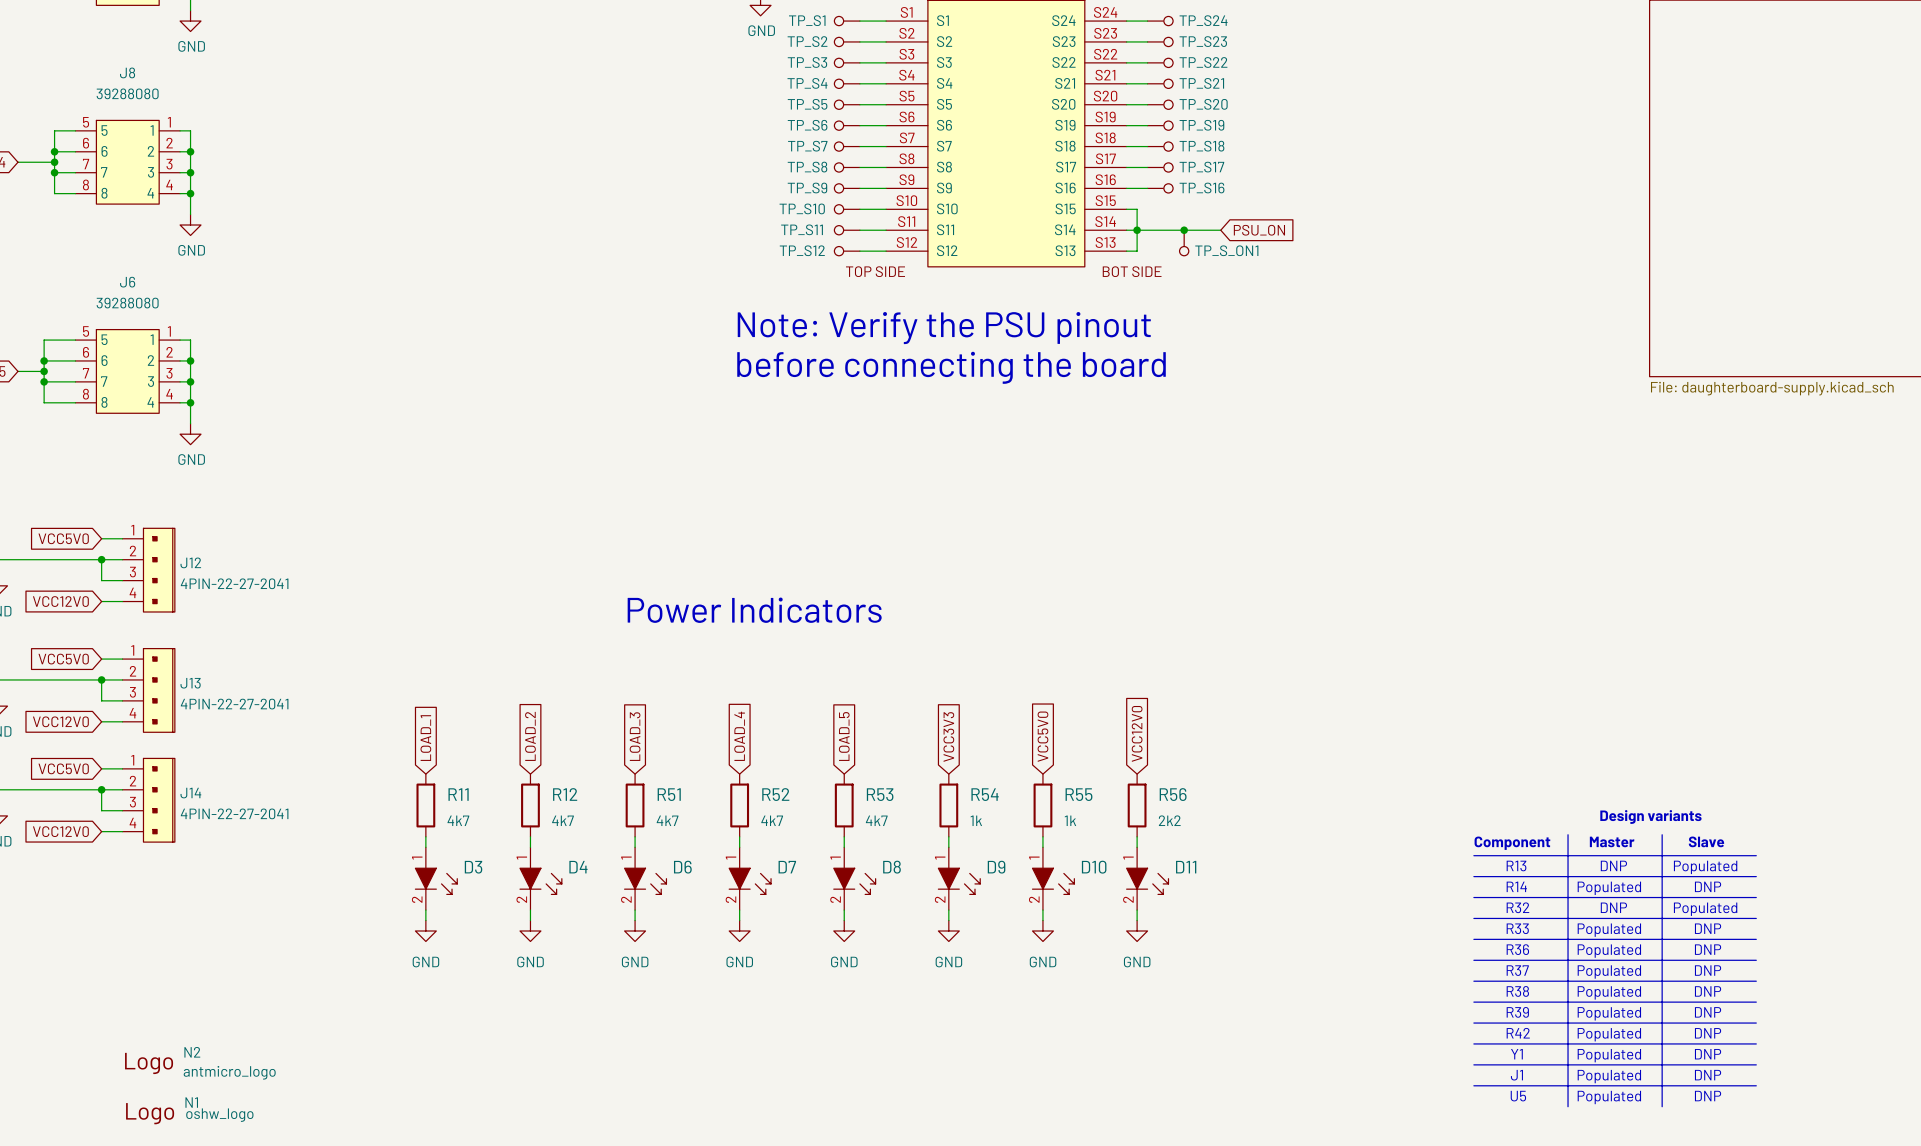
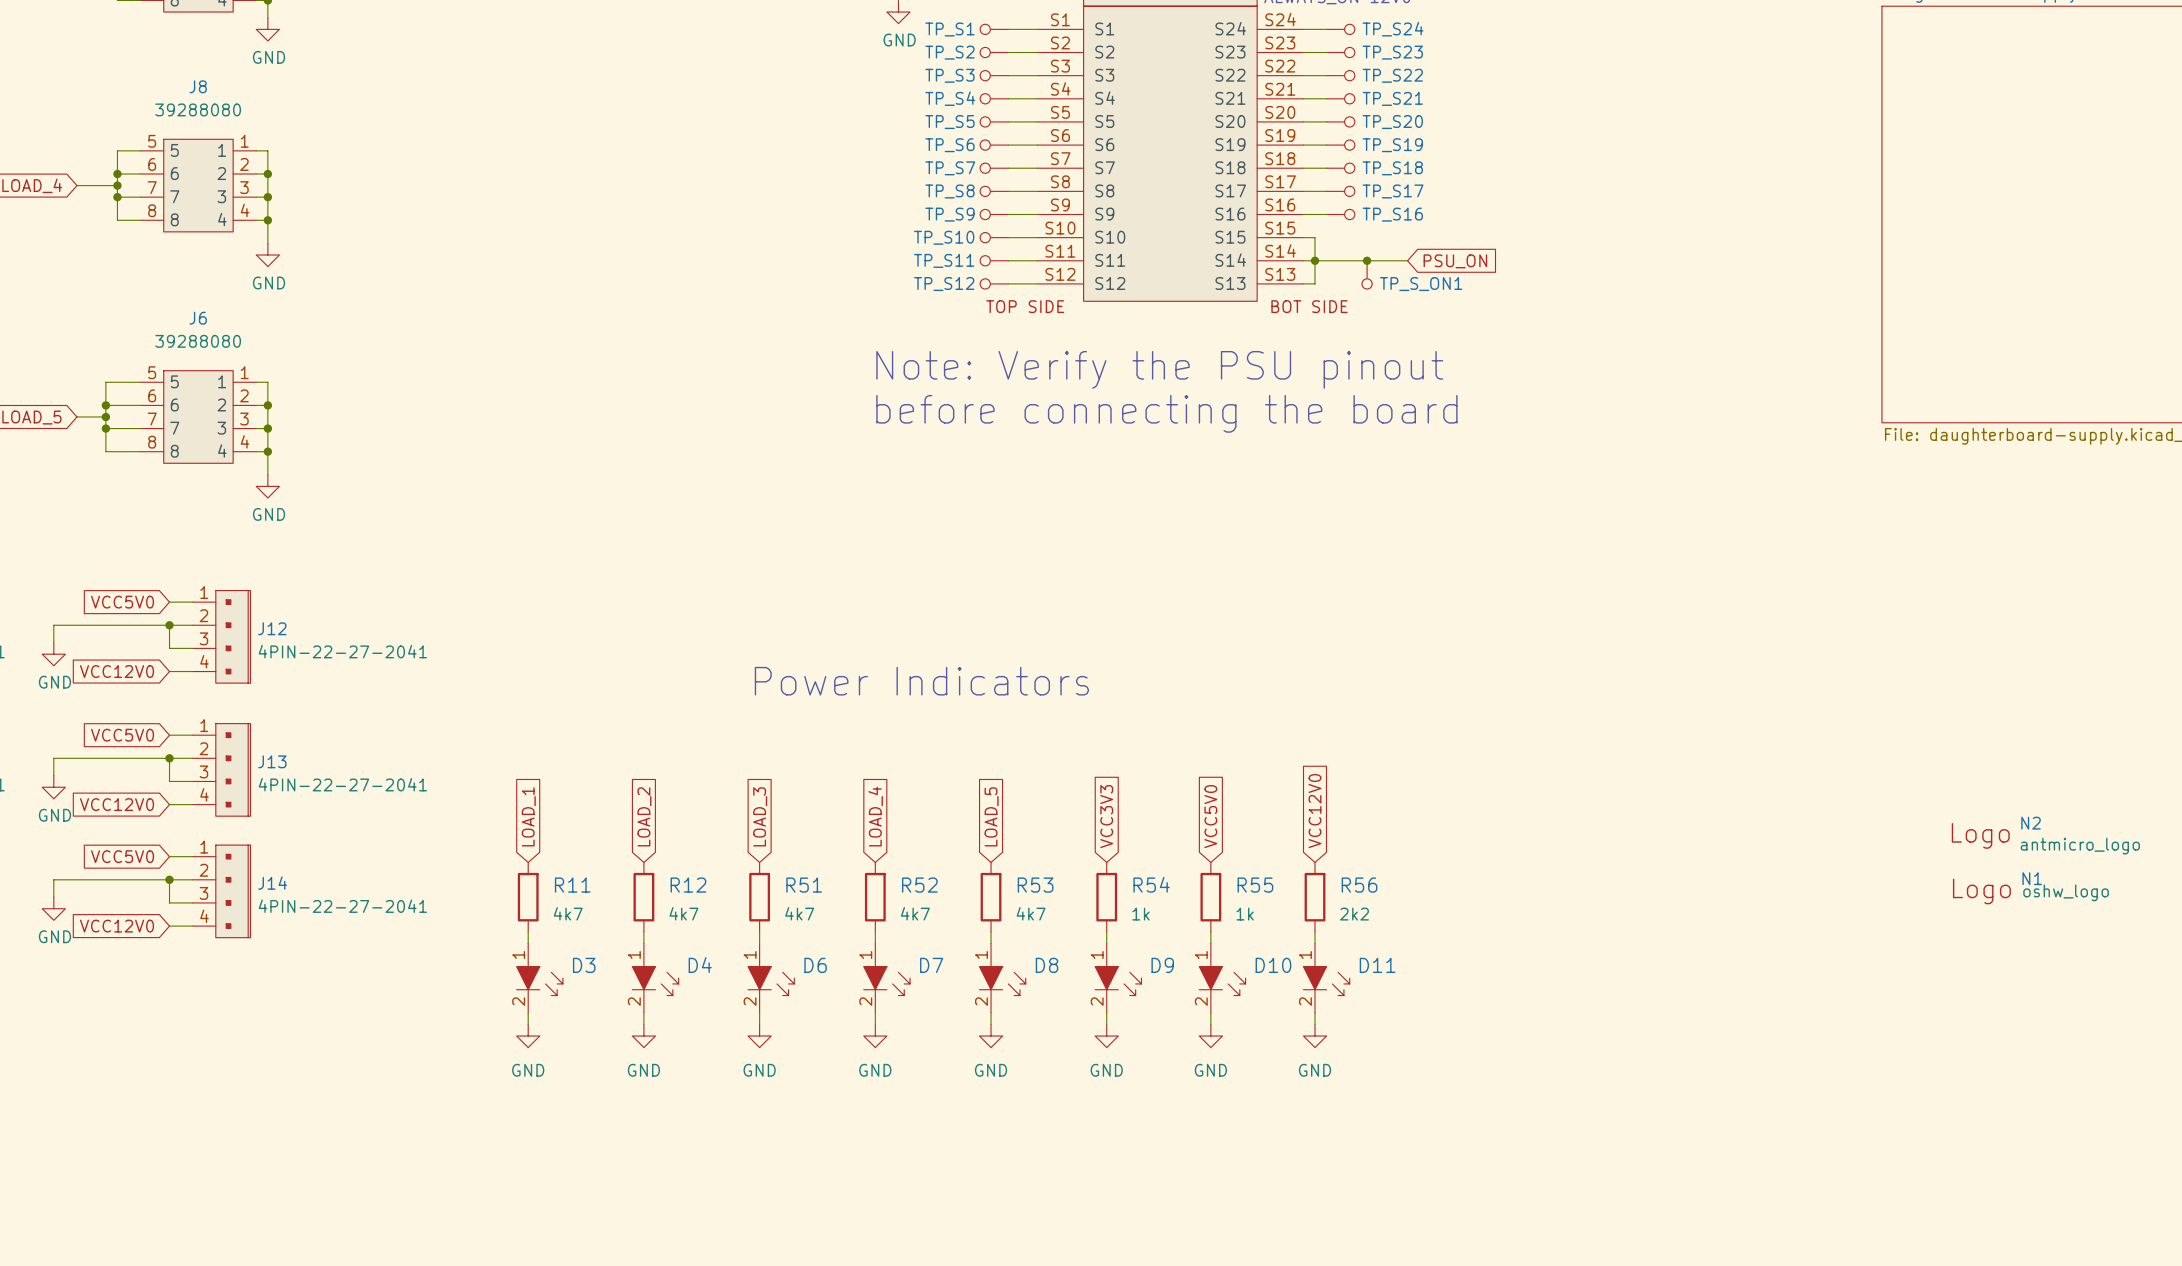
text: Design variants (1650, 816) -> none
line: (1568, 834) (1568, 1106) -> none
line: (1662, 834) (1662, 1106) -> none
text: Master (1612, 841) -> none
text: Slave (1706, 841) -> none
text: Component (1512, 843) -> none
line: (1473, 855) (1756, 855) -> none
text: DNP (1613, 865) -> none
text: R13 (1516, 866) -> none
text: Populated (1705, 867) -> none
line: (1473, 876) (1756, 876) -> none
text: R14 (1516, 886) -> none
text: DNP (1708, 886) -> none
text: Populated (1609, 888) -> none
line: (1473, 897) (1756, 897) -> none
text: R32 (1517, 907) -> none
text: DNP (1613, 907) -> none
text: Populated (1705, 909) -> none
line: (1473, 918) (1756, 918) -> none
text: R33 (1517, 928) -> none
text: DNP (1708, 928) -> none
text: Populated (1609, 930) -> none
line: (1473, 939) (1756, 939) -> none
text: R36 (1517, 949) -> none
text: DNP (1708, 949) -> none
text: Populated (1609, 951) -> none
line: (1473, 960) (1756, 960) -> none
text: R37 (1517, 970) -> none
text: DNP (1708, 970) -> none
text: Populated (1609, 971) -> none
line: (1473, 981) (1756, 981) -> none
text: R38 (1517, 991) -> none
text: DNP (1708, 991) -> none
text: Populated (1609, 992) -> none
line: (1473, 1002) (1756, 1002) -> none
text: R39 (1517, 1012) -> none
text: DNP (1708, 1012) -> none
text: Populated (1609, 1013) -> none
line: (1473, 1023) (1756, 1023) -> none
text: R42 (1518, 1033) -> none
text: DNP (1708, 1033) -> none
text: Populated (1609, 1034) -> none
line: (1473, 1043) (1756, 1043) -> none
text: Y1 (1516, 1054) -> none
text: DNP (1708, 1054) -> none
text: Populated (1609, 1055) -> none
N2 position: (200, 1063) -> (2045, 835)
line: (1473, 1064) (1756, 1064) -> none
text: J1 (1516, 1075) -> none
text: DNP (1708, 1075) -> none
text: Populated (1609, 1076) -> none
line: (1473, 1085) (1756, 1085) -> none
text: U5 (1518, 1096) -> none
text: DNP (1708, 1096) -> none
text: Populated (1609, 1097) -> none
N1 position: (189, 1110) -> (2030, 888)

